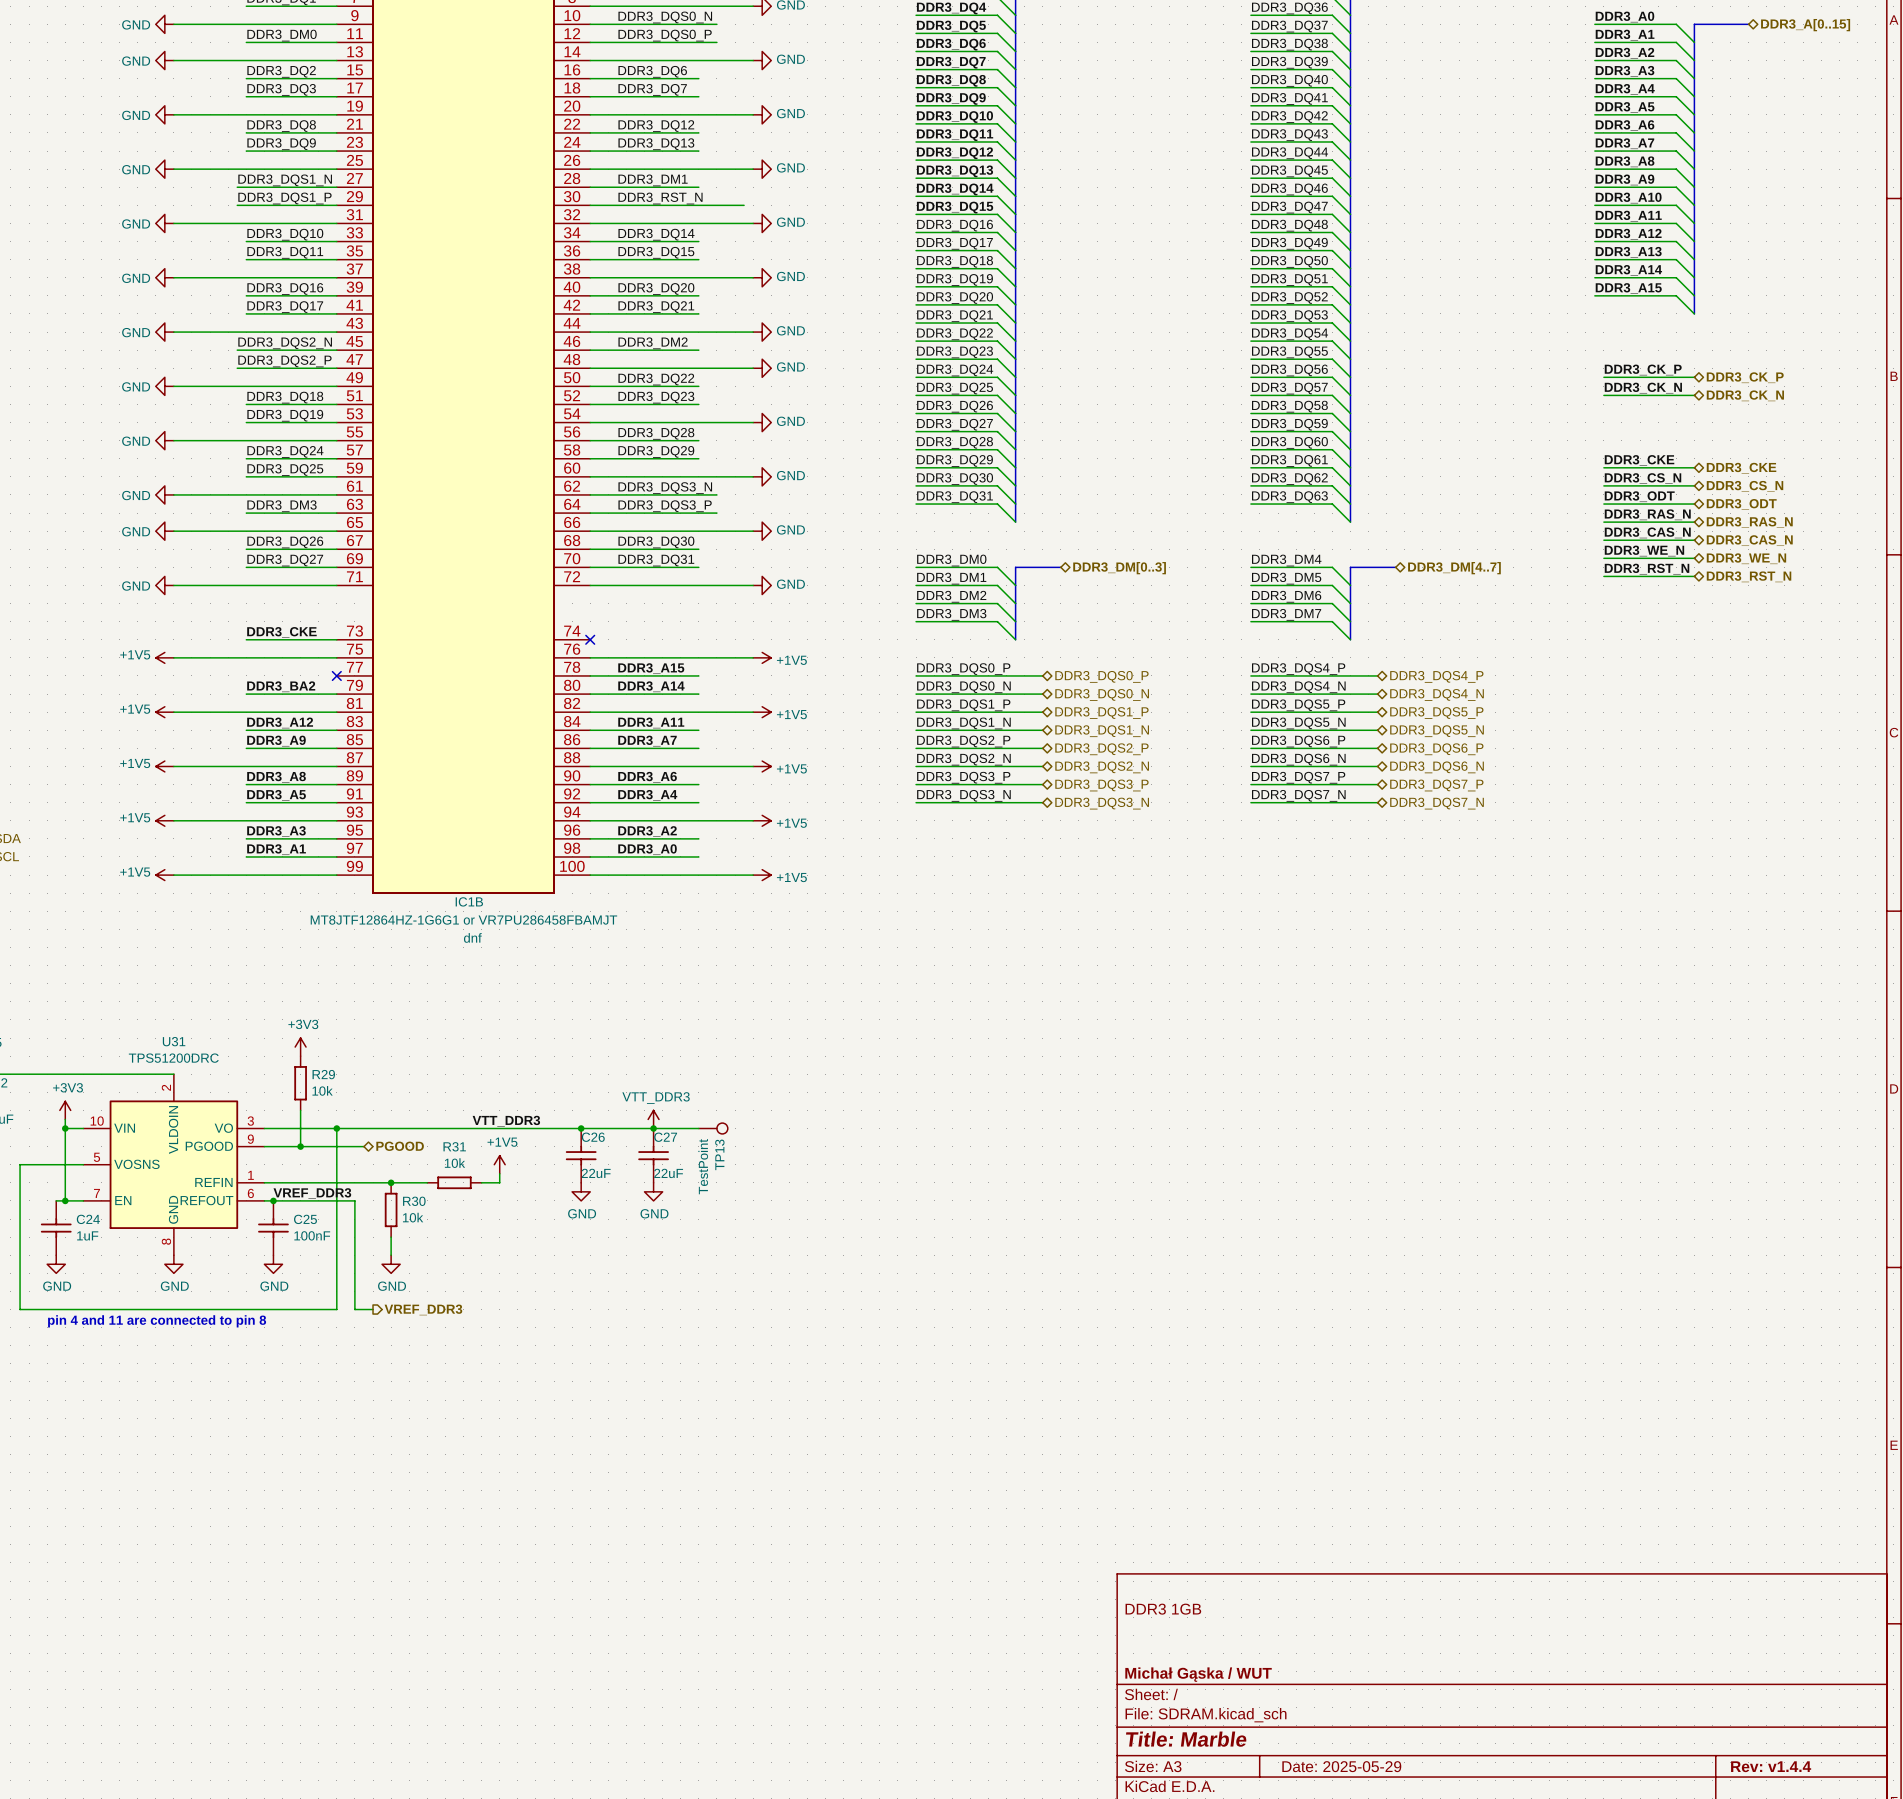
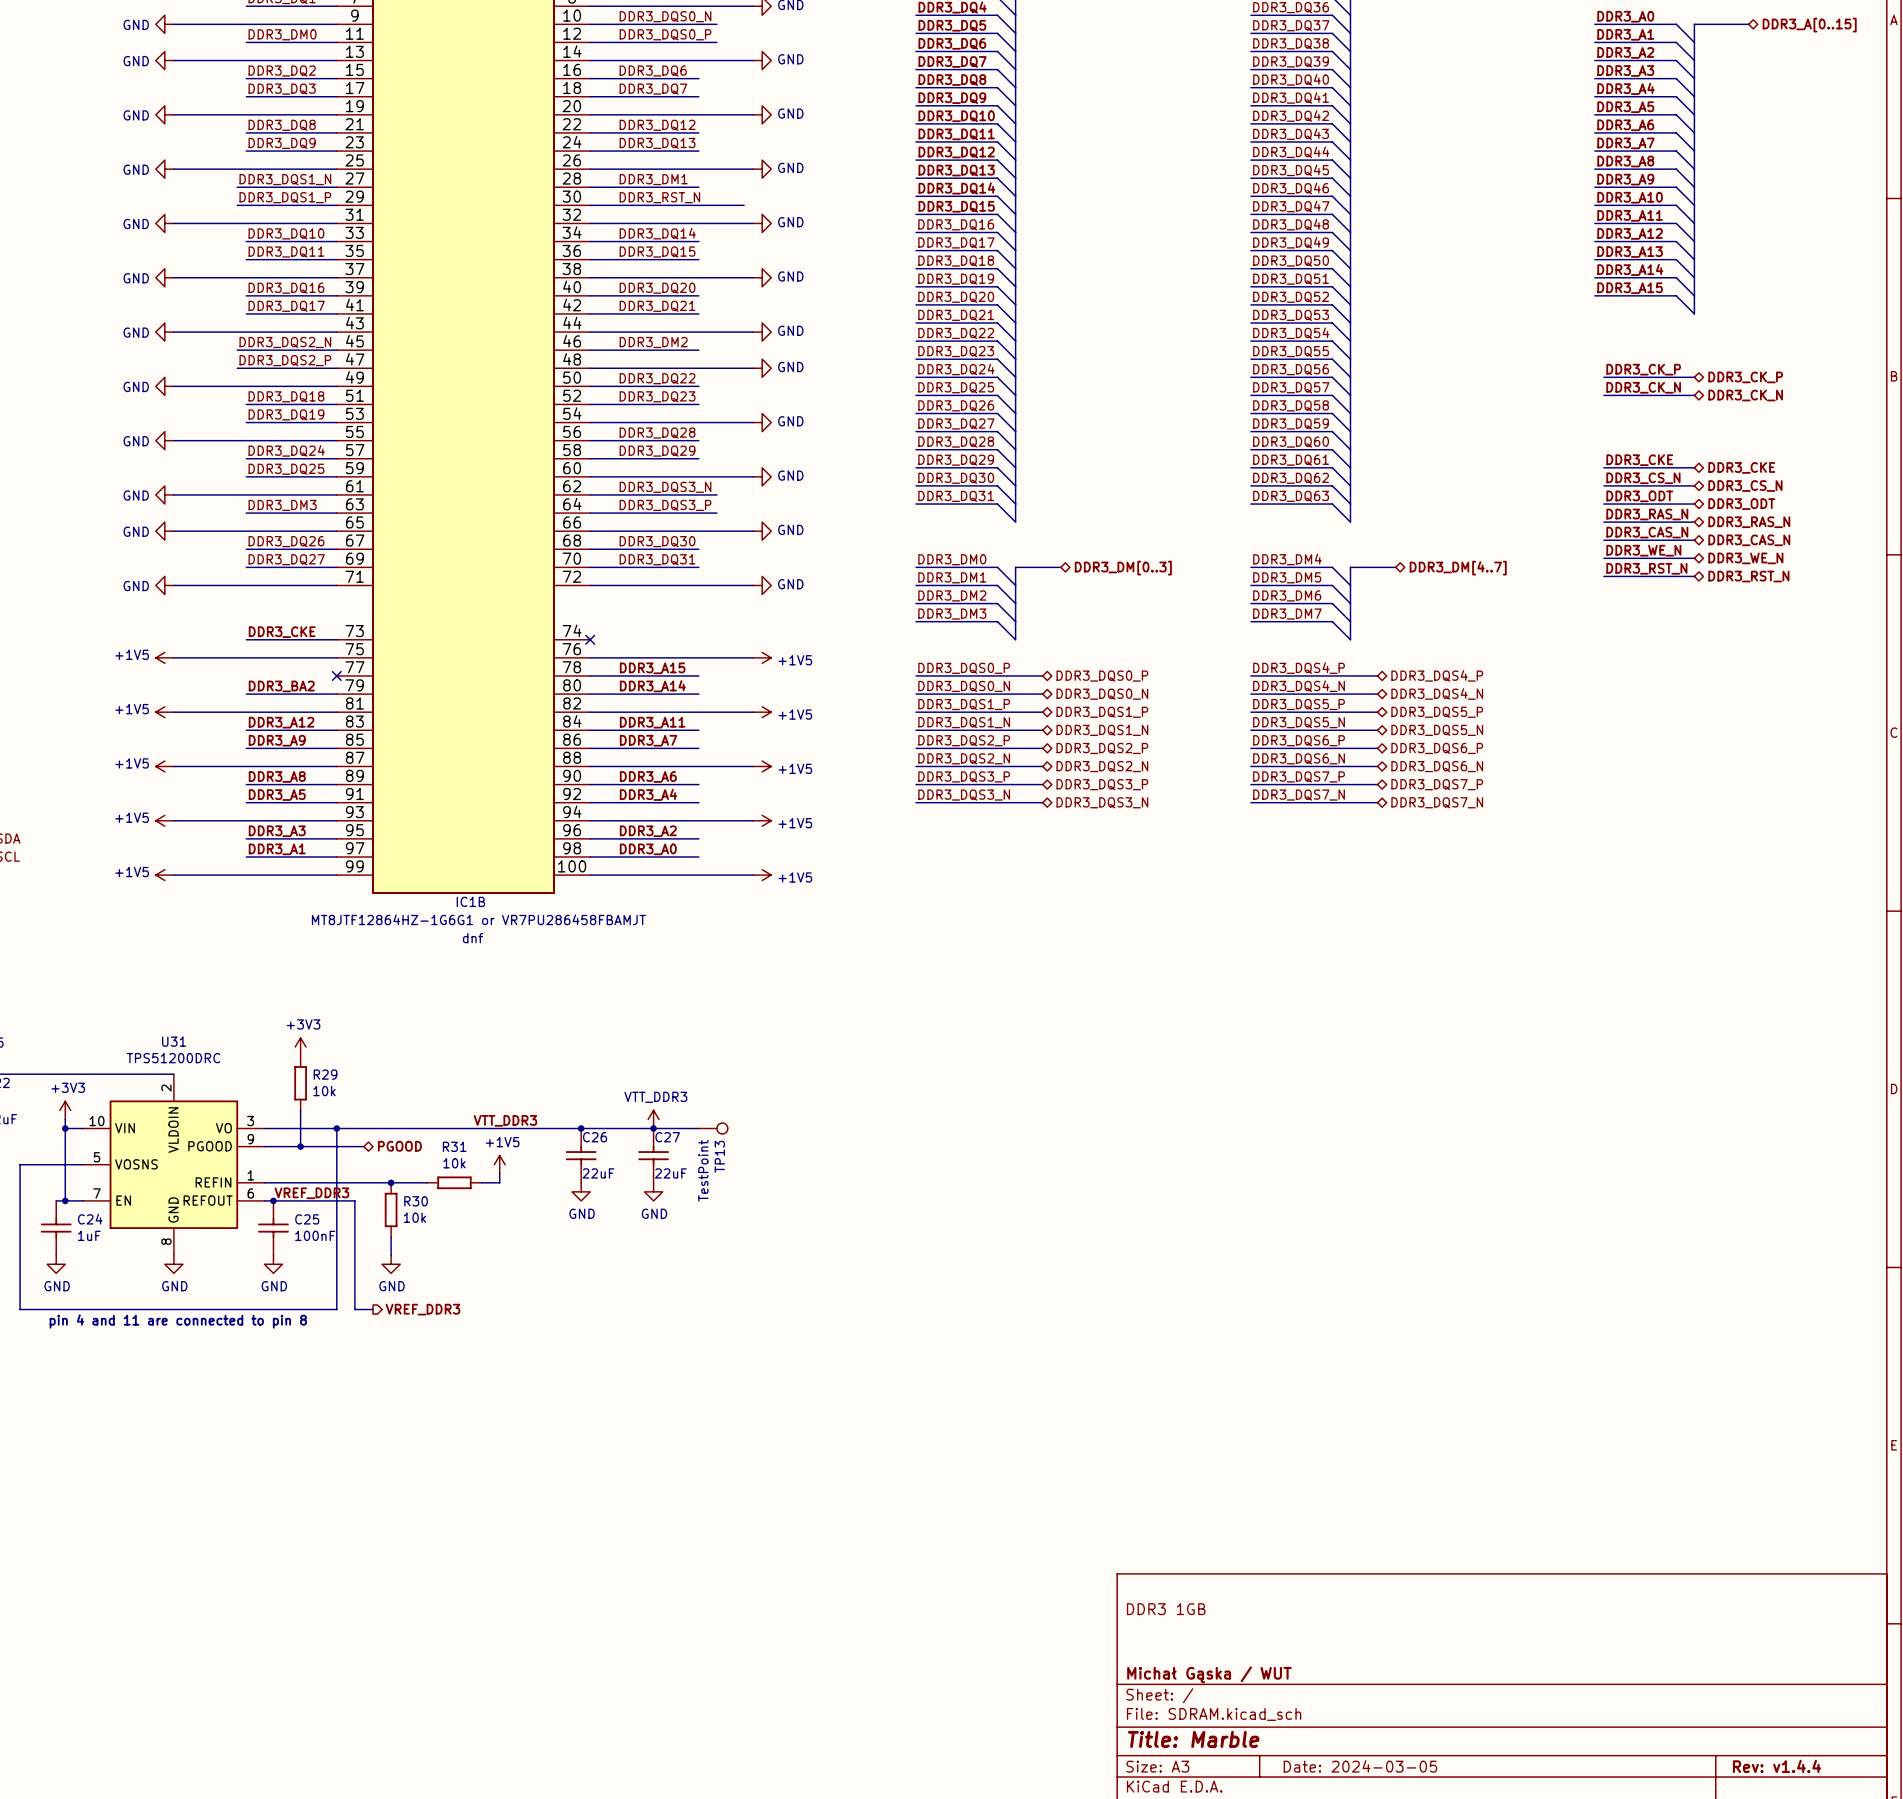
title block: Date: 2025-05-29 (1341, 1766) -> Date: 2024-03-05 (1360, 1766)

